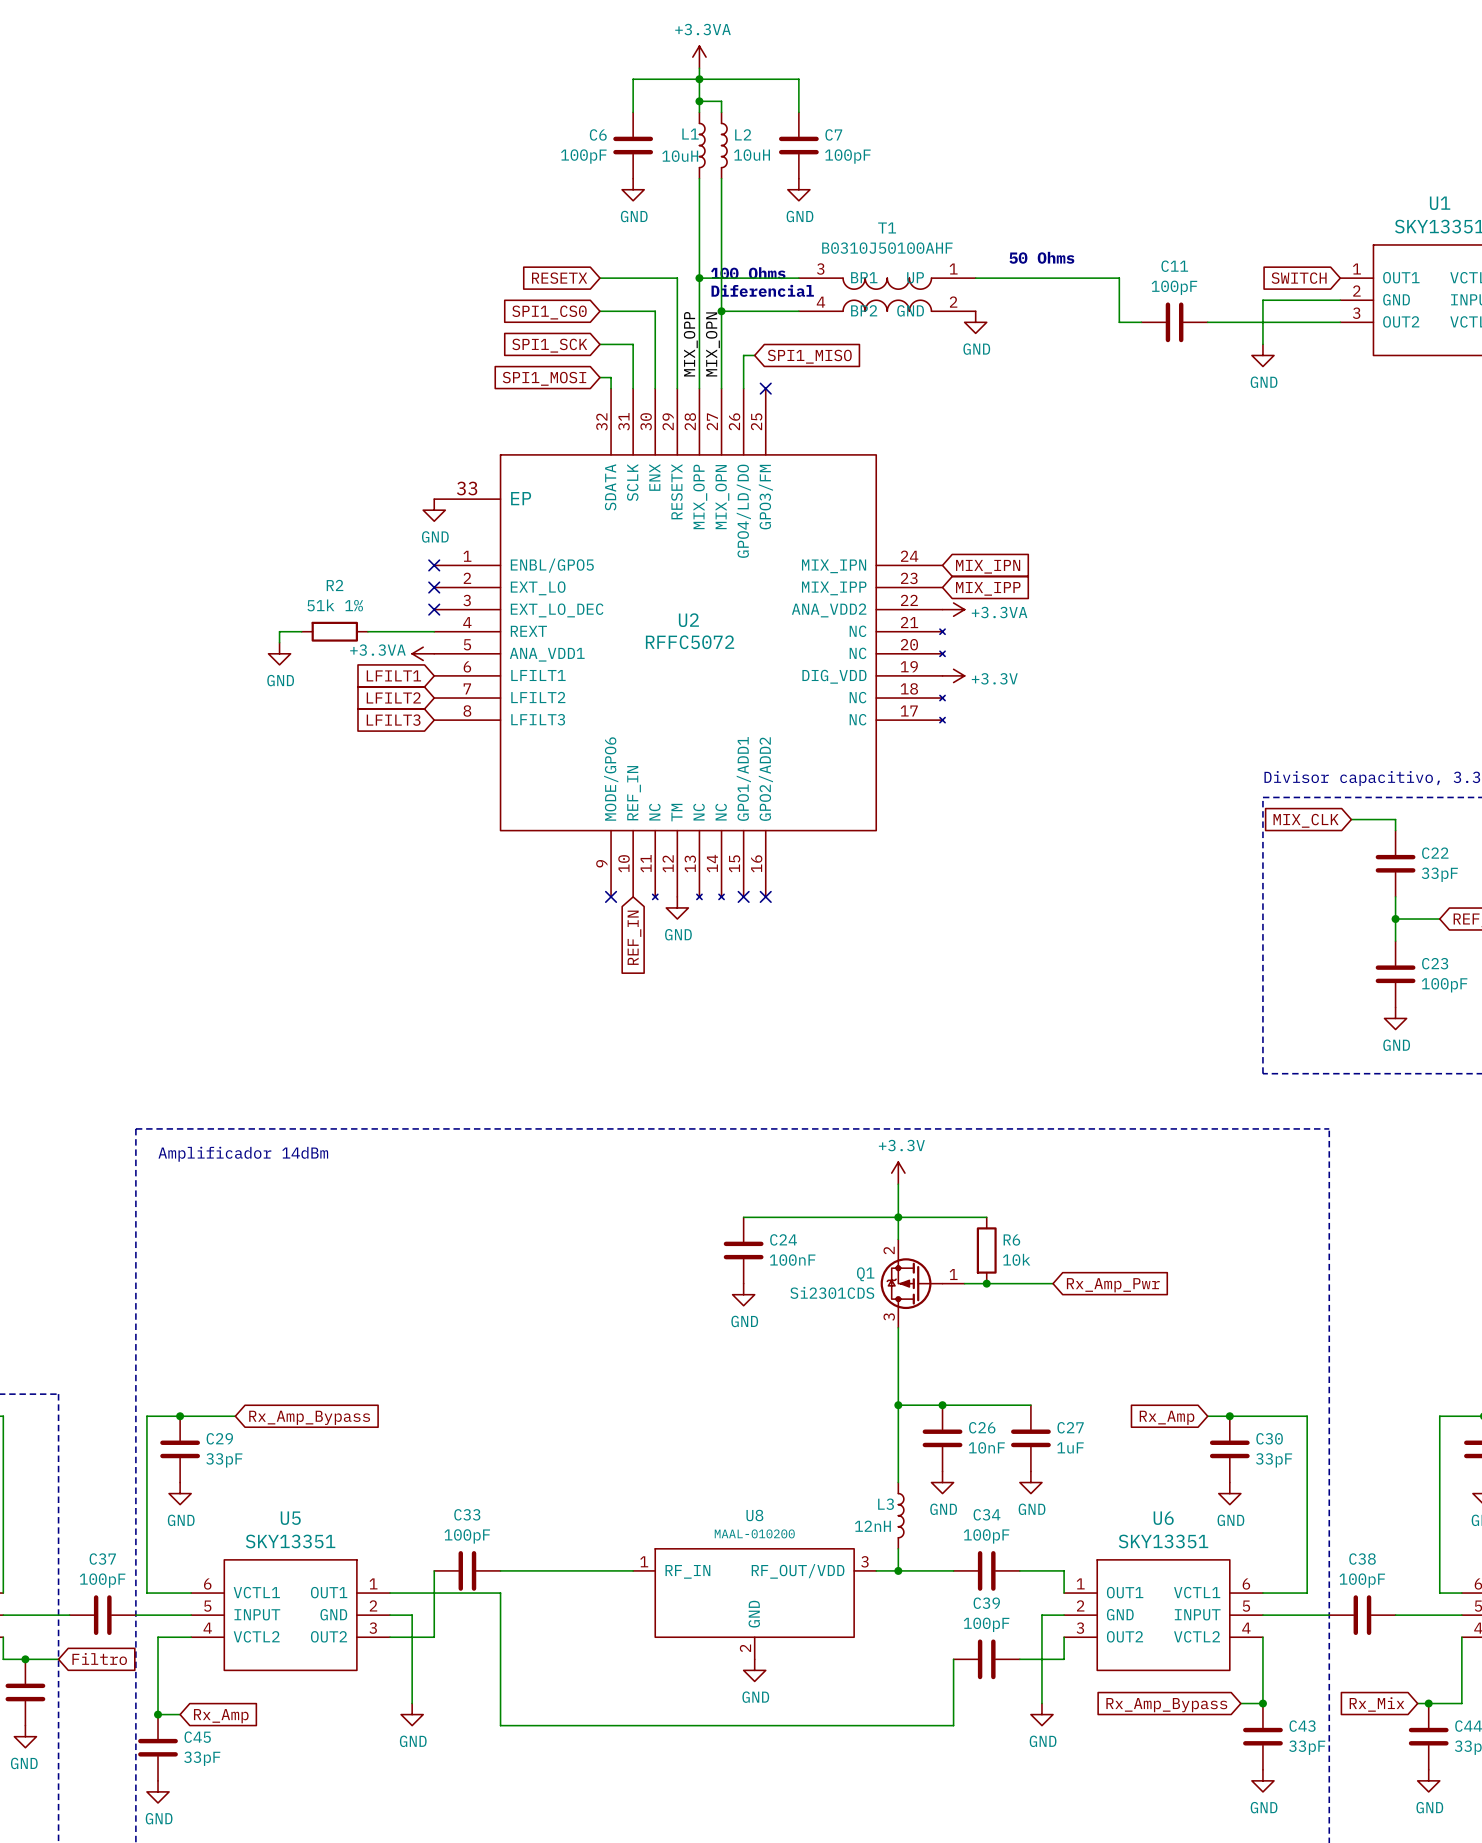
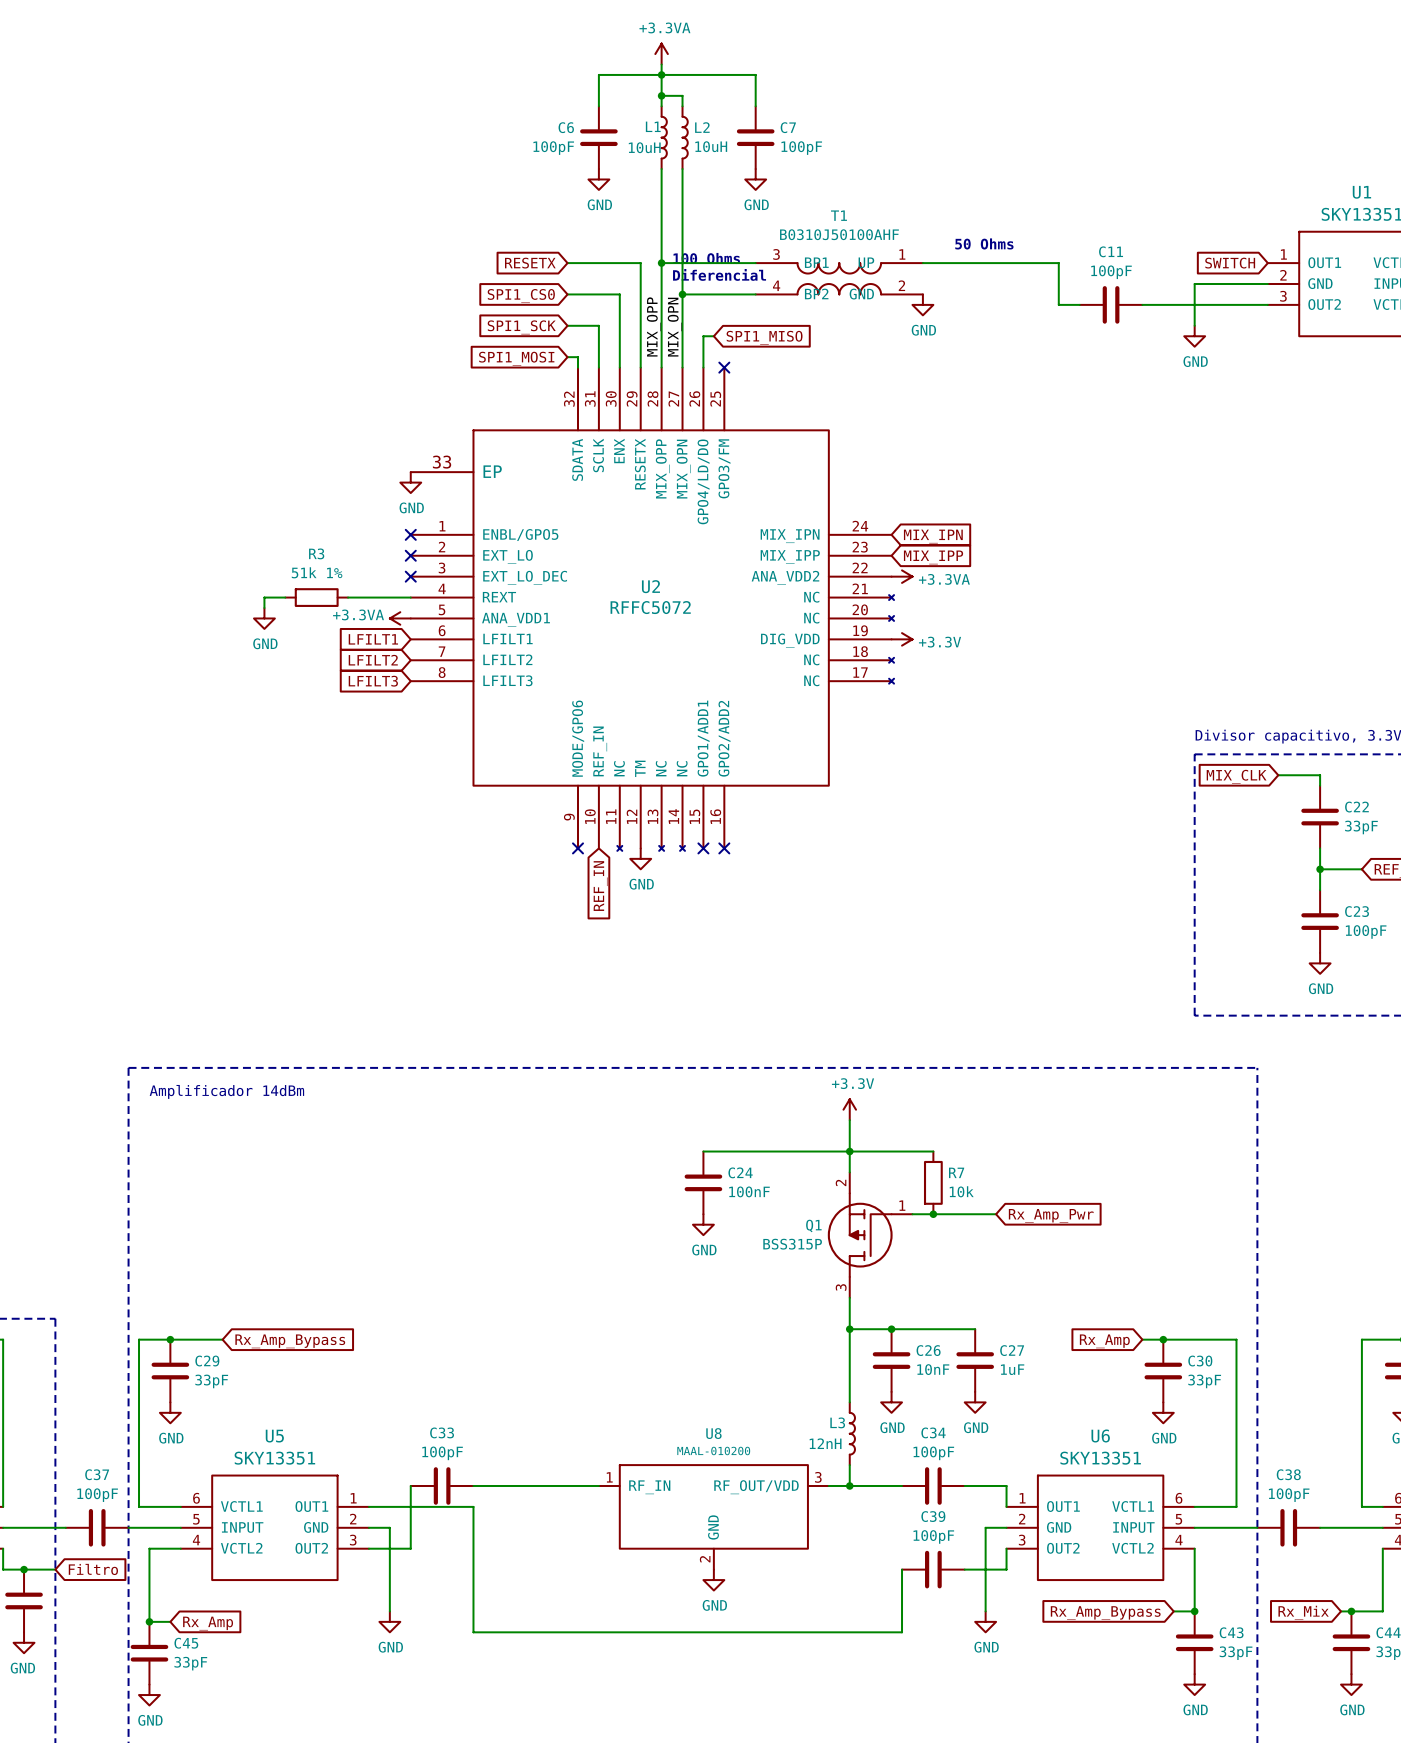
R2 name: R2 (335, 585) -> R3 (316, 553)
Q1 symbol: [880, 1239, 965, 1328] -> [827, 1172, 913, 1298]
R6 name: R6 (1011, 1240) -> R7 (956, 1172)
Q1 value: Si2301CDS (832, 1292) -> BSS315P (792, 1244)

